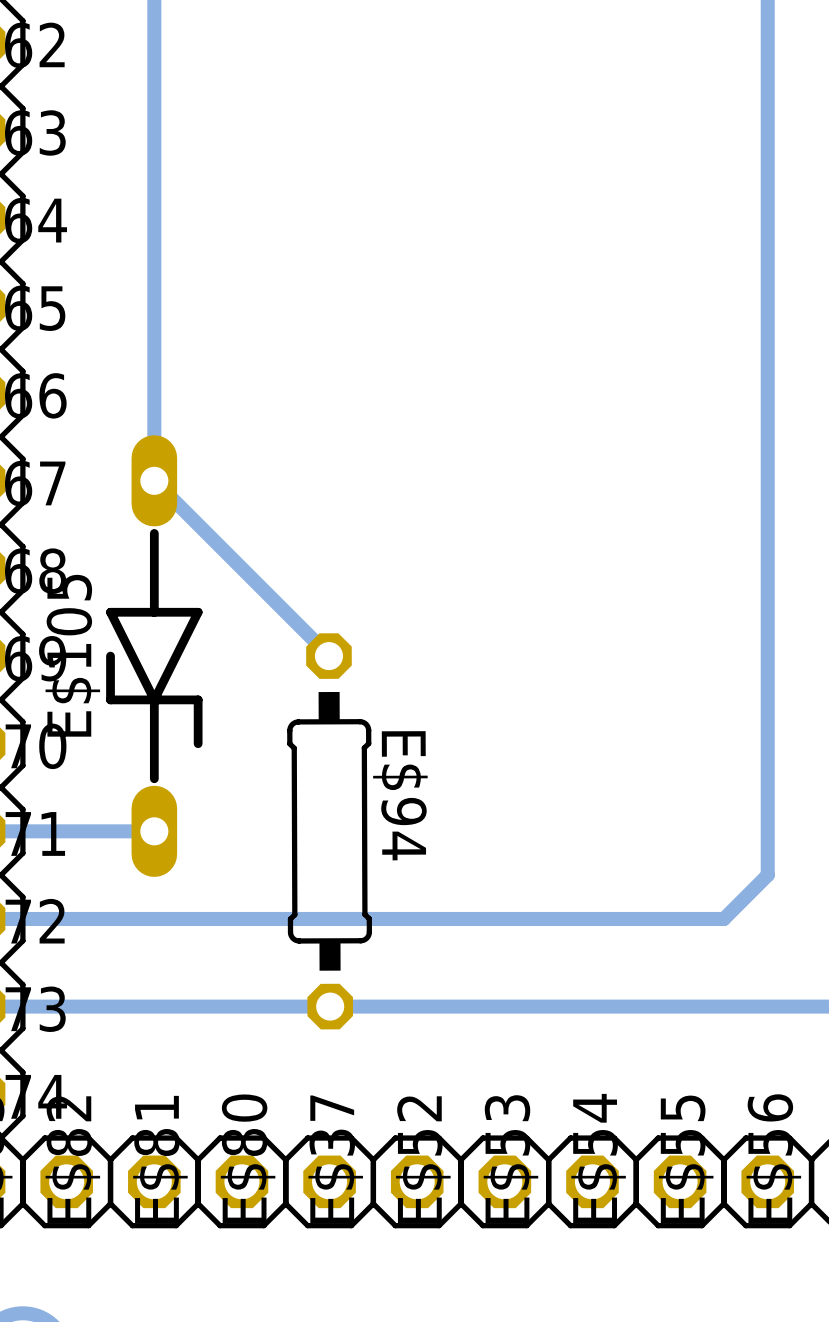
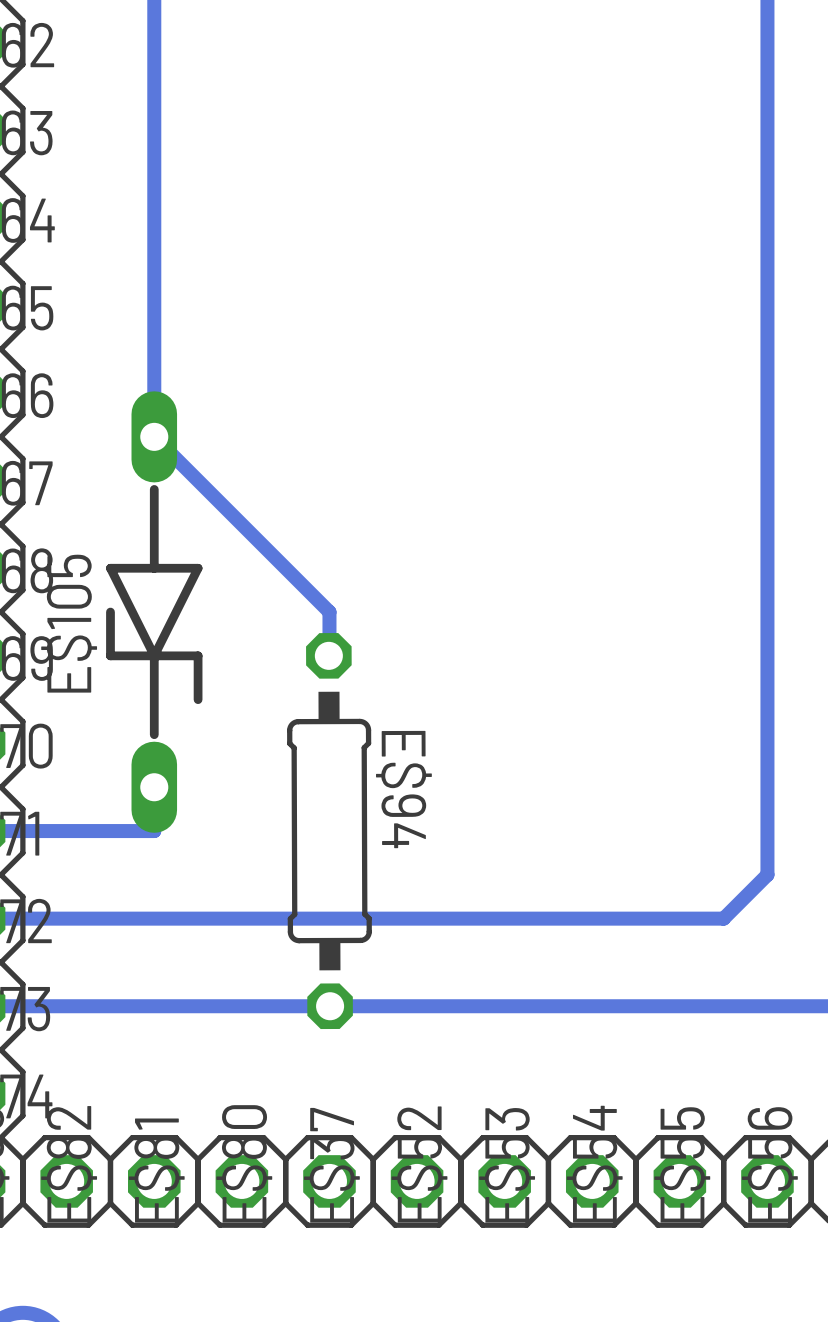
bottom track: (154, 437) (154, 480) (329, 656) -> (154, 436) (329, 612) (329, 655)
E$105 position: (154, 656) -> (154, 612)

